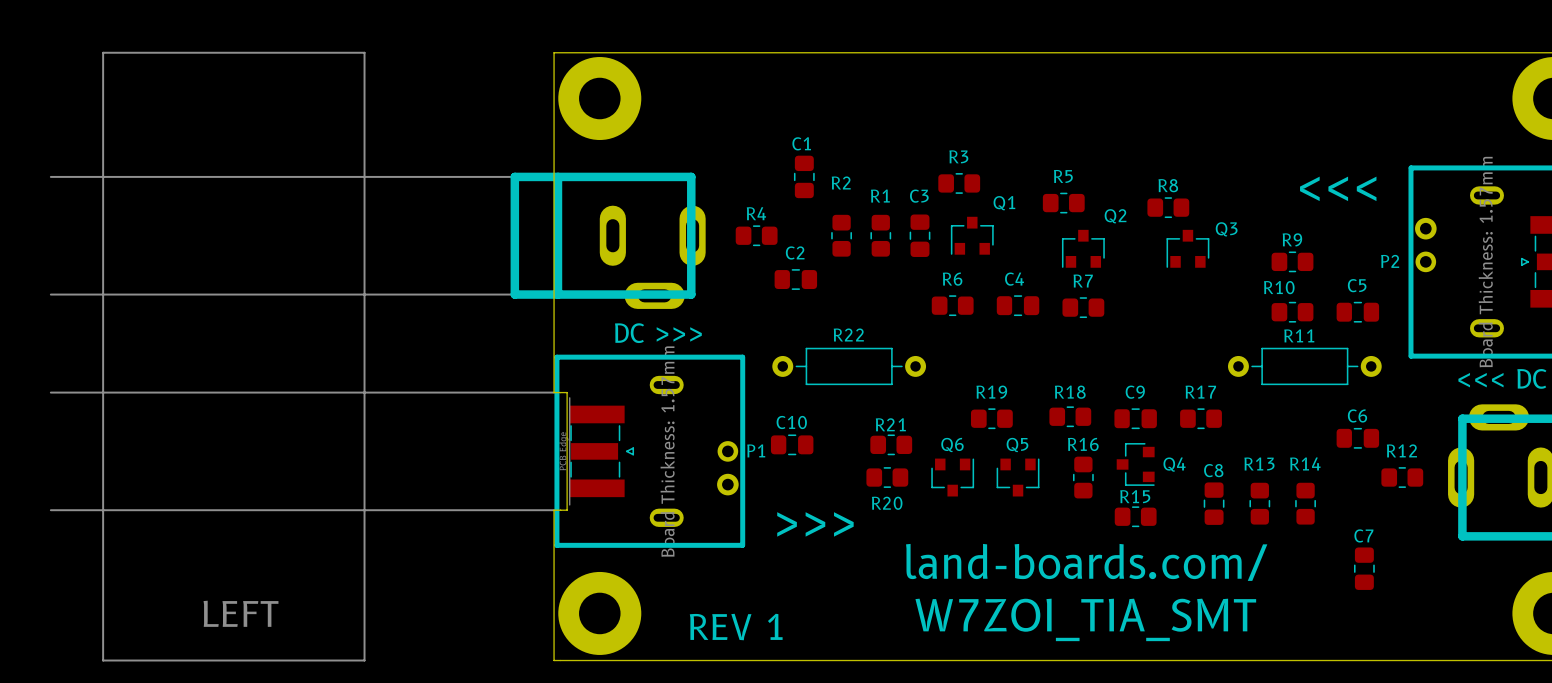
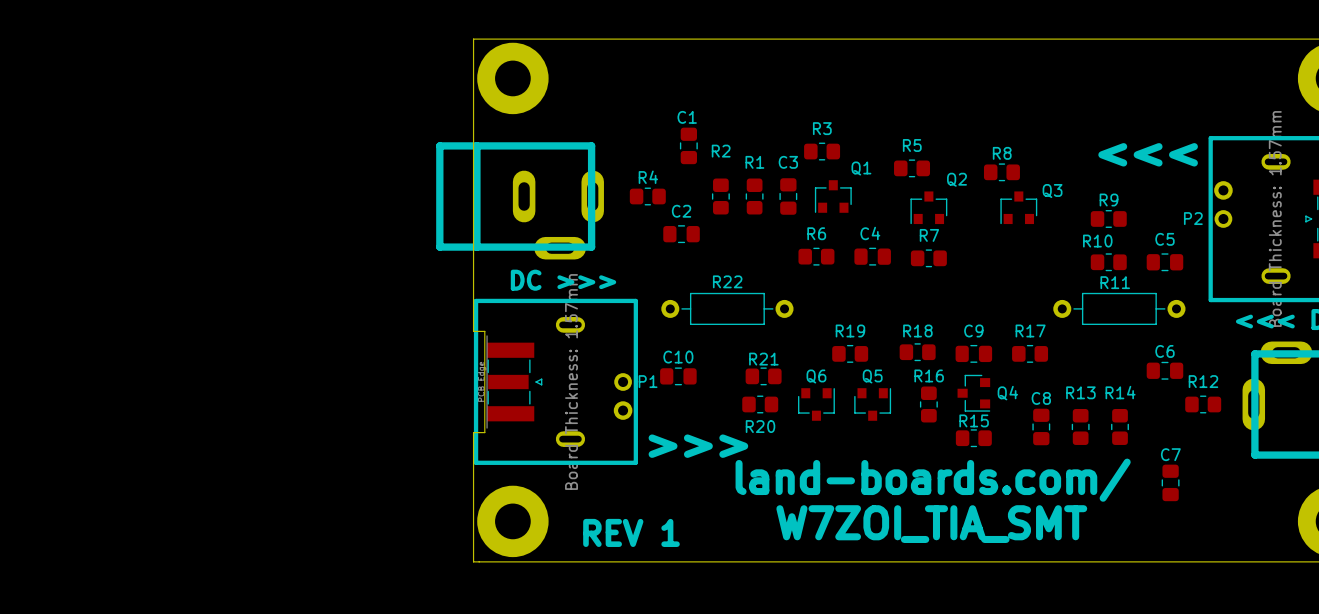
line: (103, 52) (364, 52) (364, 660) (103, 660) (103, 52) -> none
line: (50, 176) (554, 176) -> none
line: (50, 294) (554, 294) -> none
line: (50, 392) (554, 392) -> none
line: (50, 510) (554, 510) -> none
text: LEFT (241, 613) -> none

